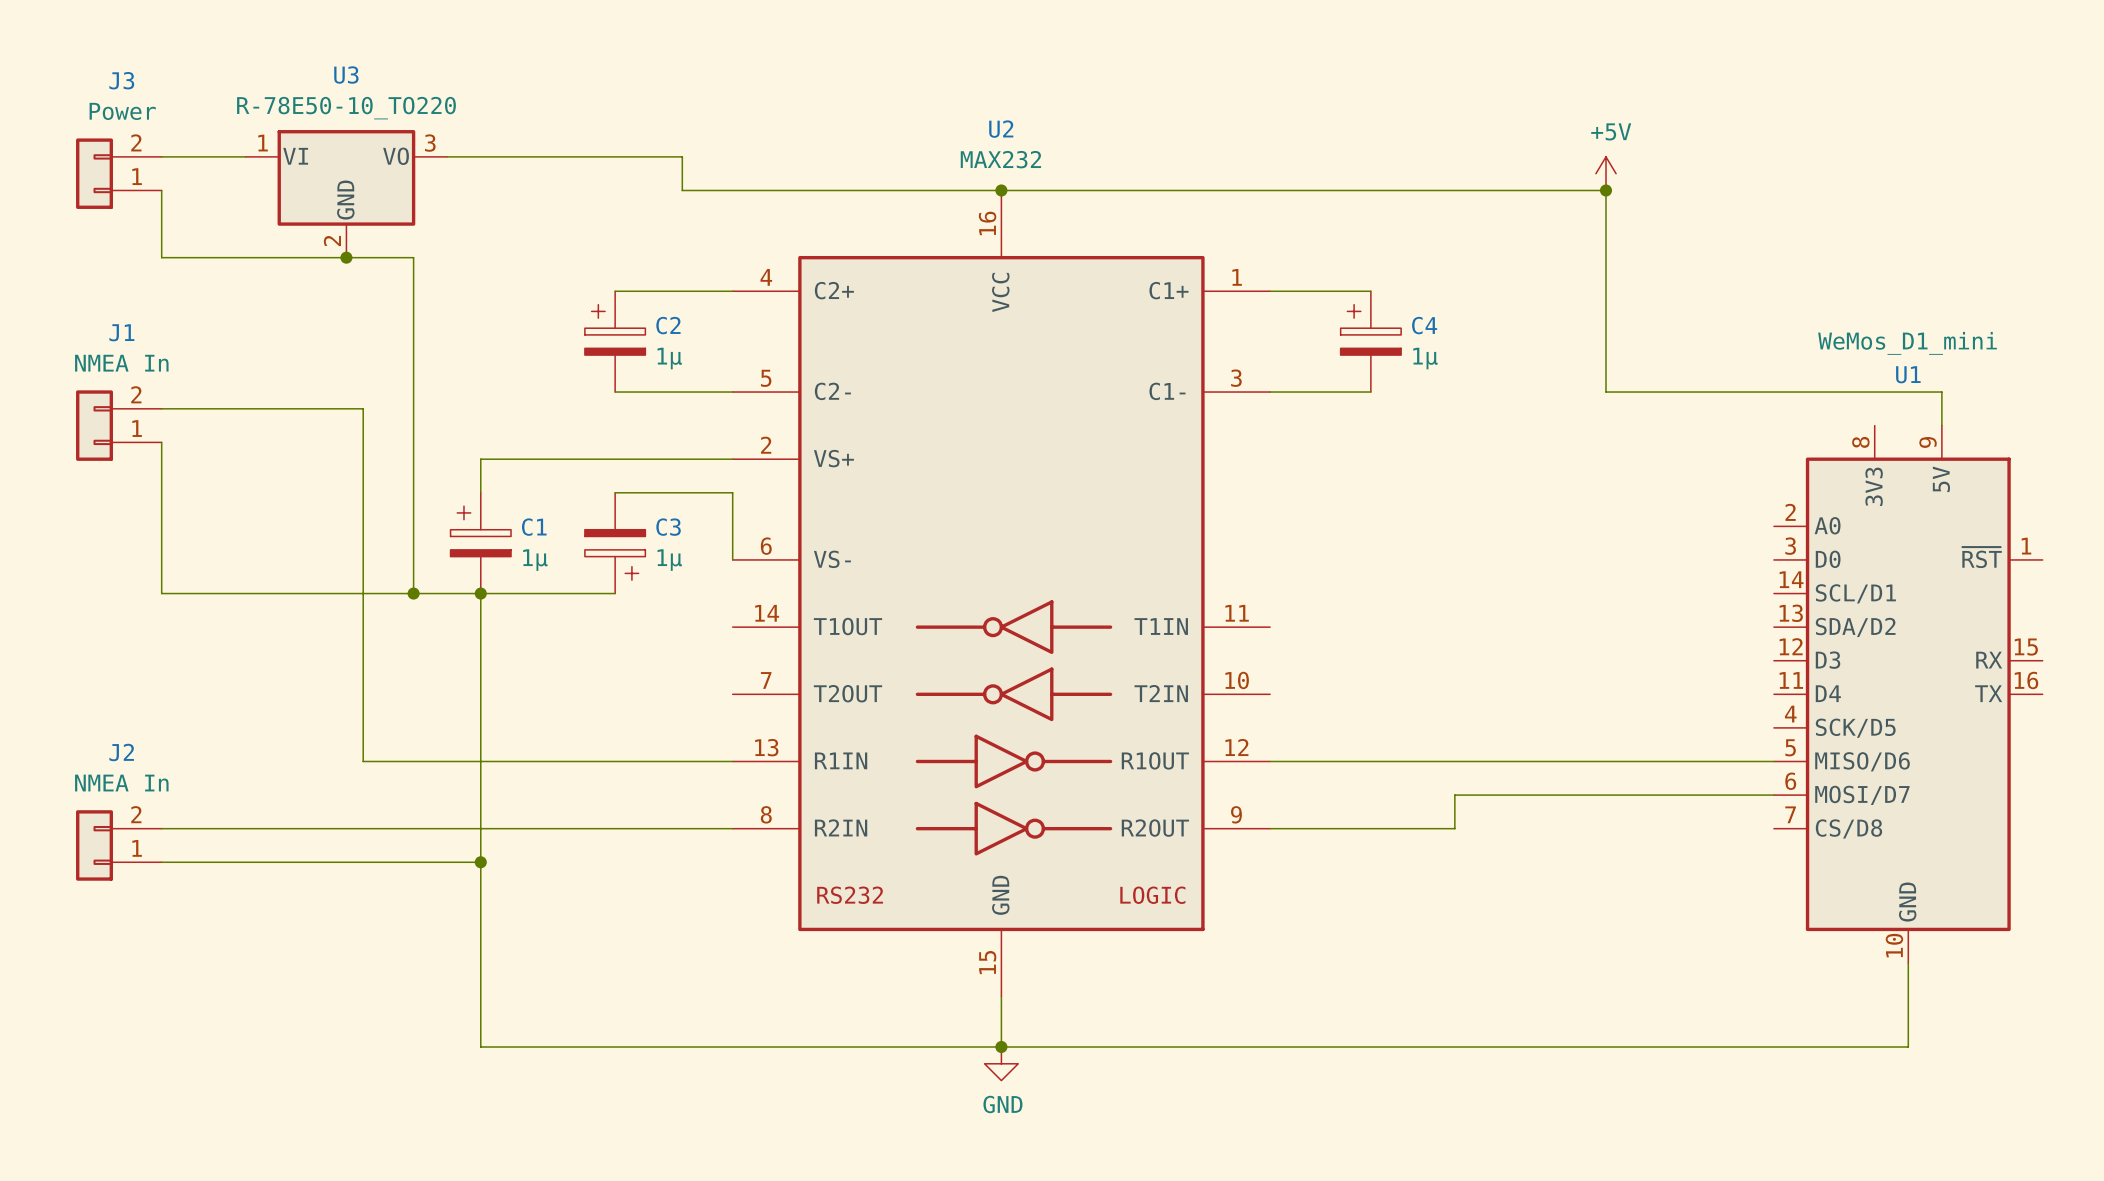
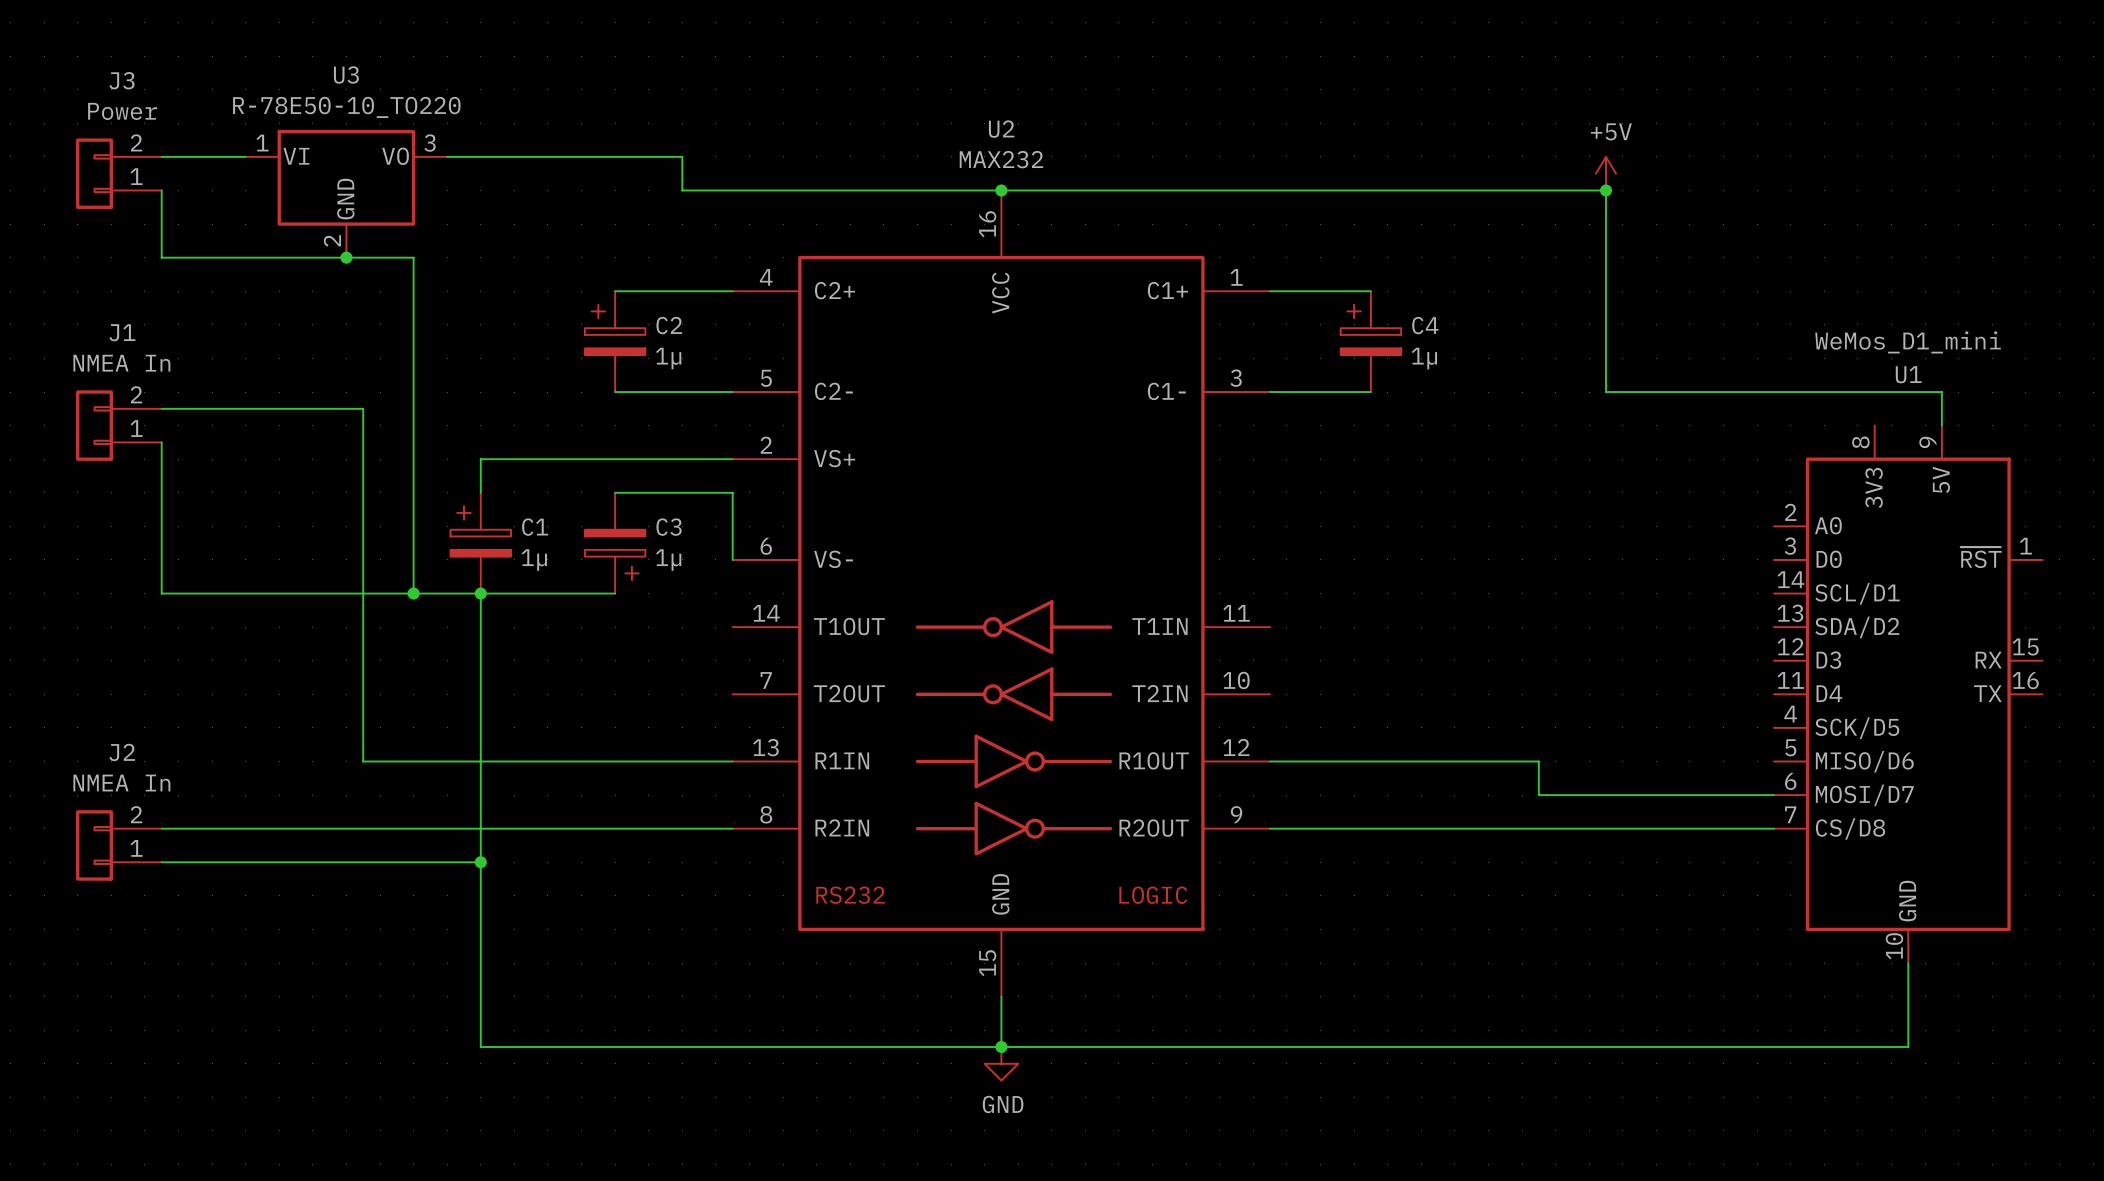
wire: (1538, 761) (1773, 761) -> none
wire: (1538, 795) (1454, 795) (1454, 828) -> (1538, 795) (1538, 761)
wire: none -> (1454, 828) (1773, 828)

